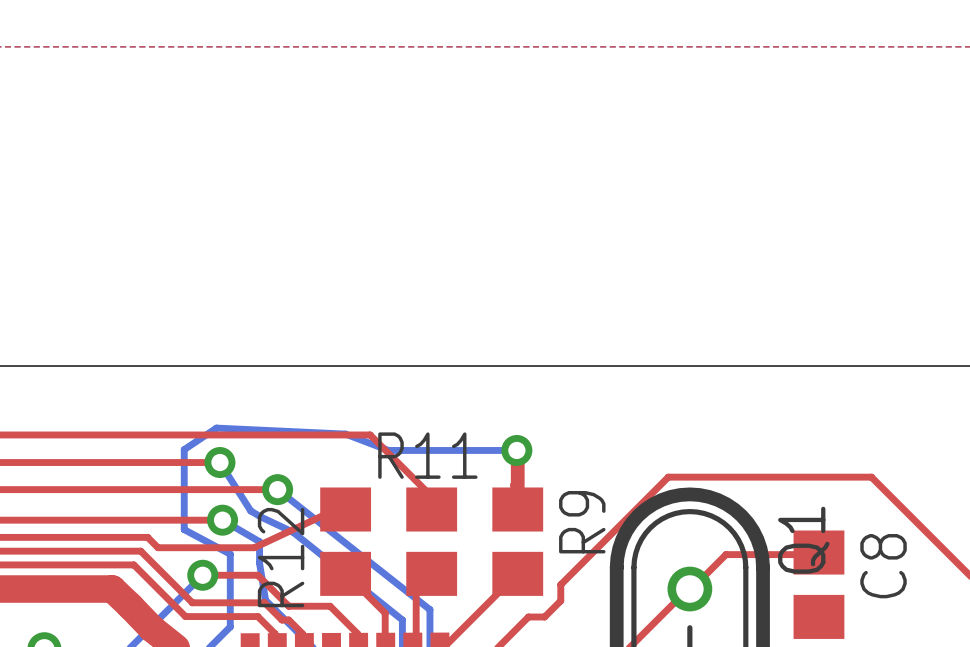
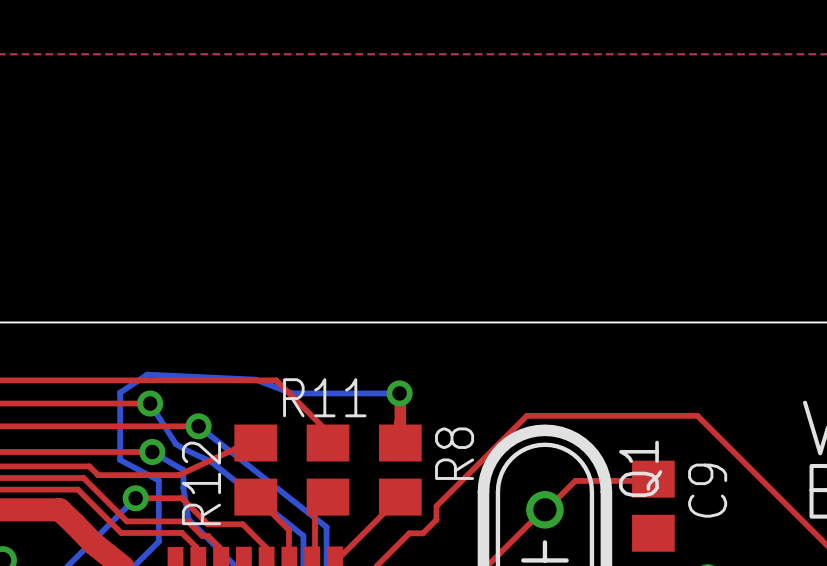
R9 name: R9 (582, 522) -> R8 (454, 453)
C8 name: C8 (883, 566) -> C9 (707, 490)

